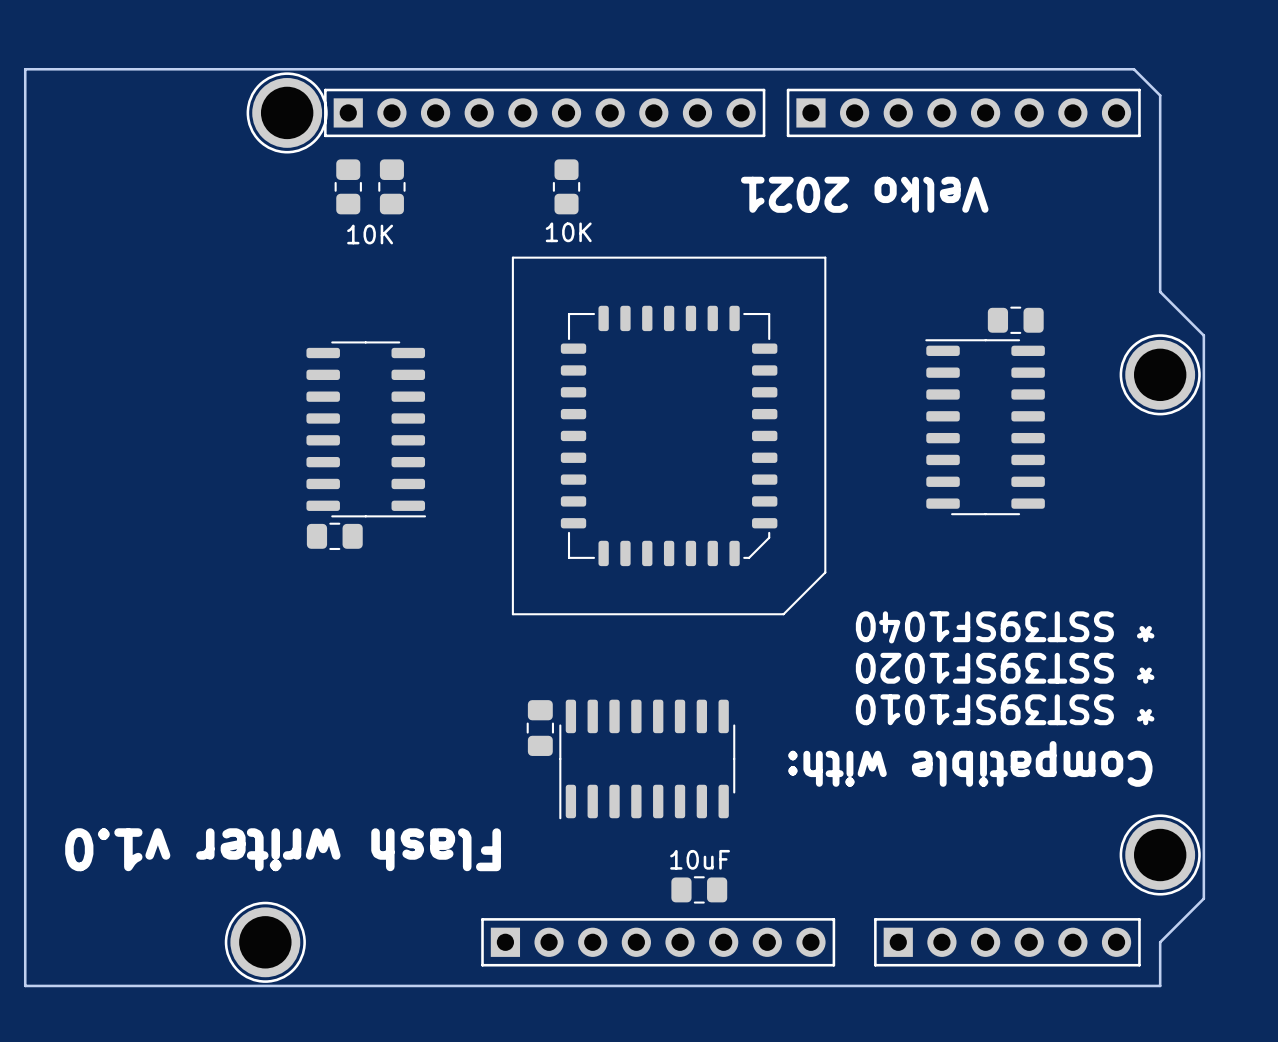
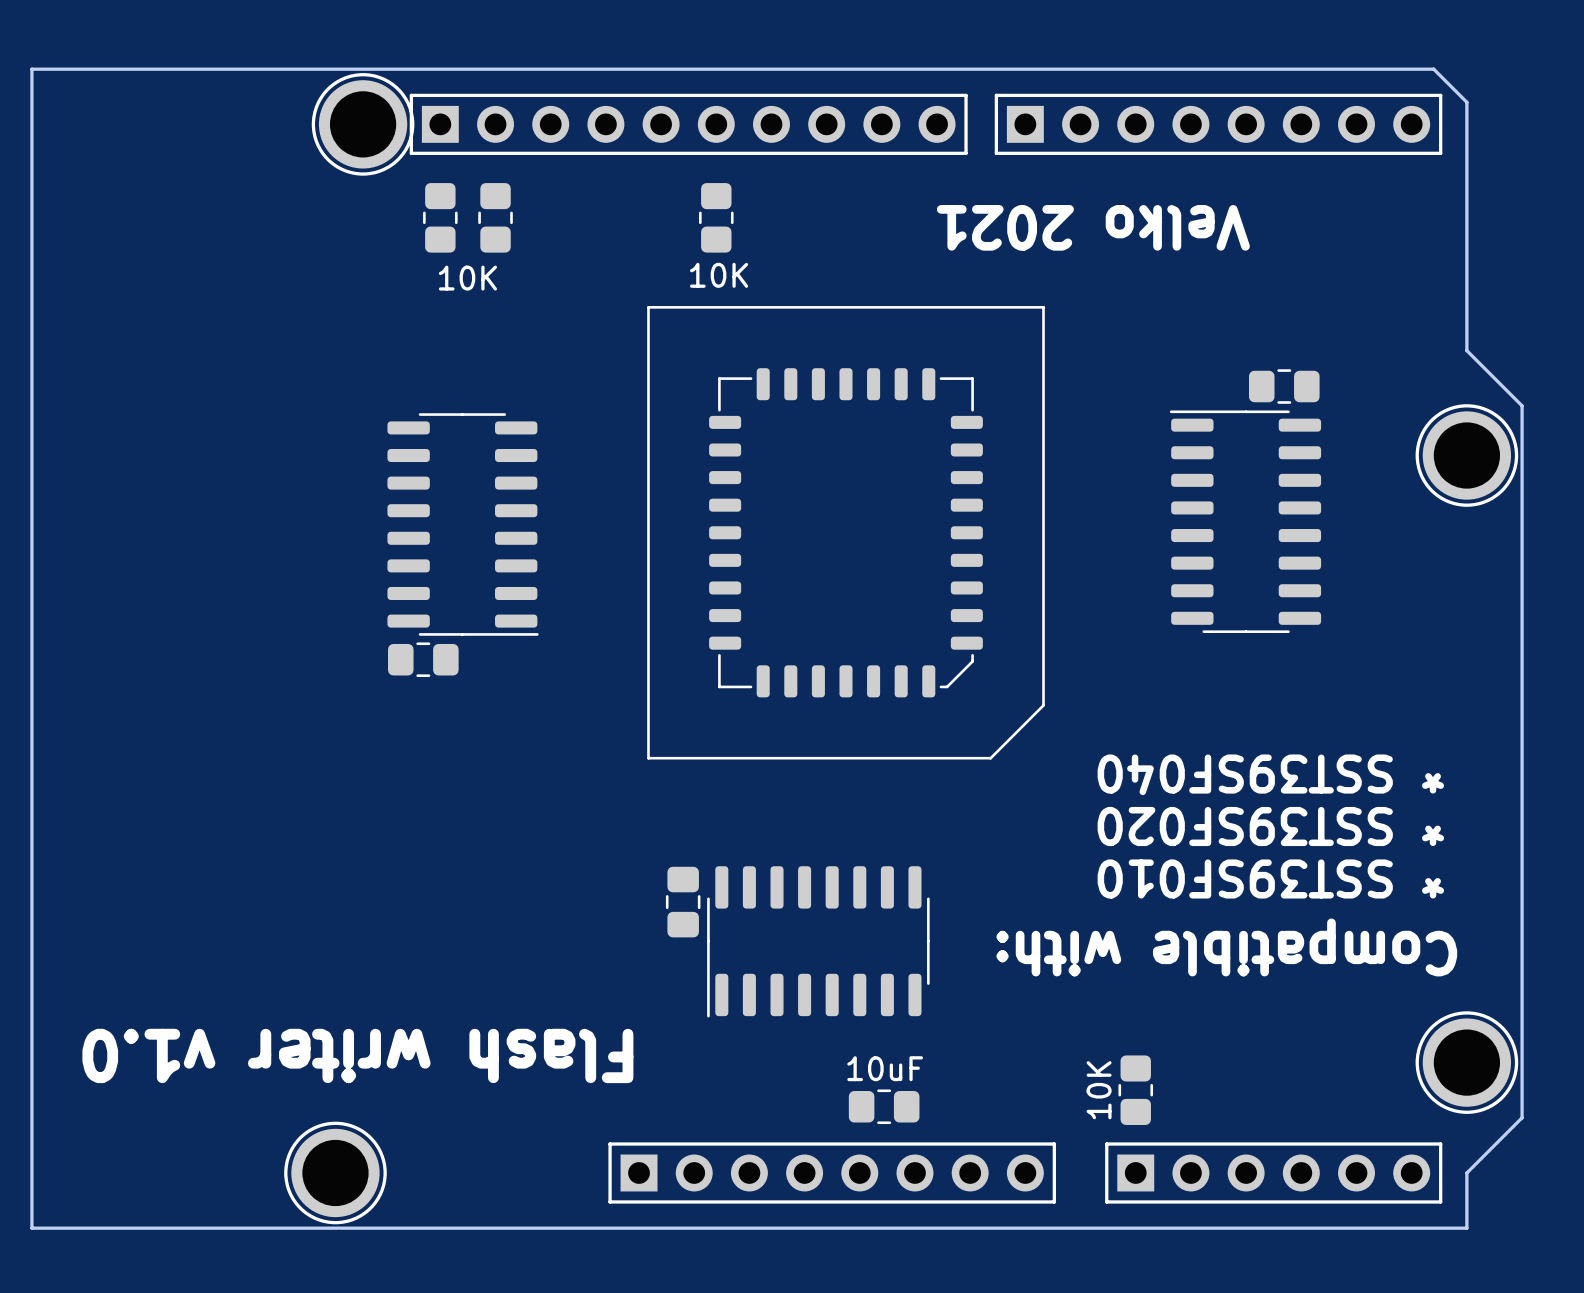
text: * SST39SF1040 (1005, 627) -> * SST39SF040 (1270, 774)
text: * SST39SF1020 (1005, 668) -> * SST39SF020 (1270, 826)
text: * SST39SF1010 (1005, 709) -> * SST39SF010 (1270, 878)
part: none -> 10K (1135, 1090)

